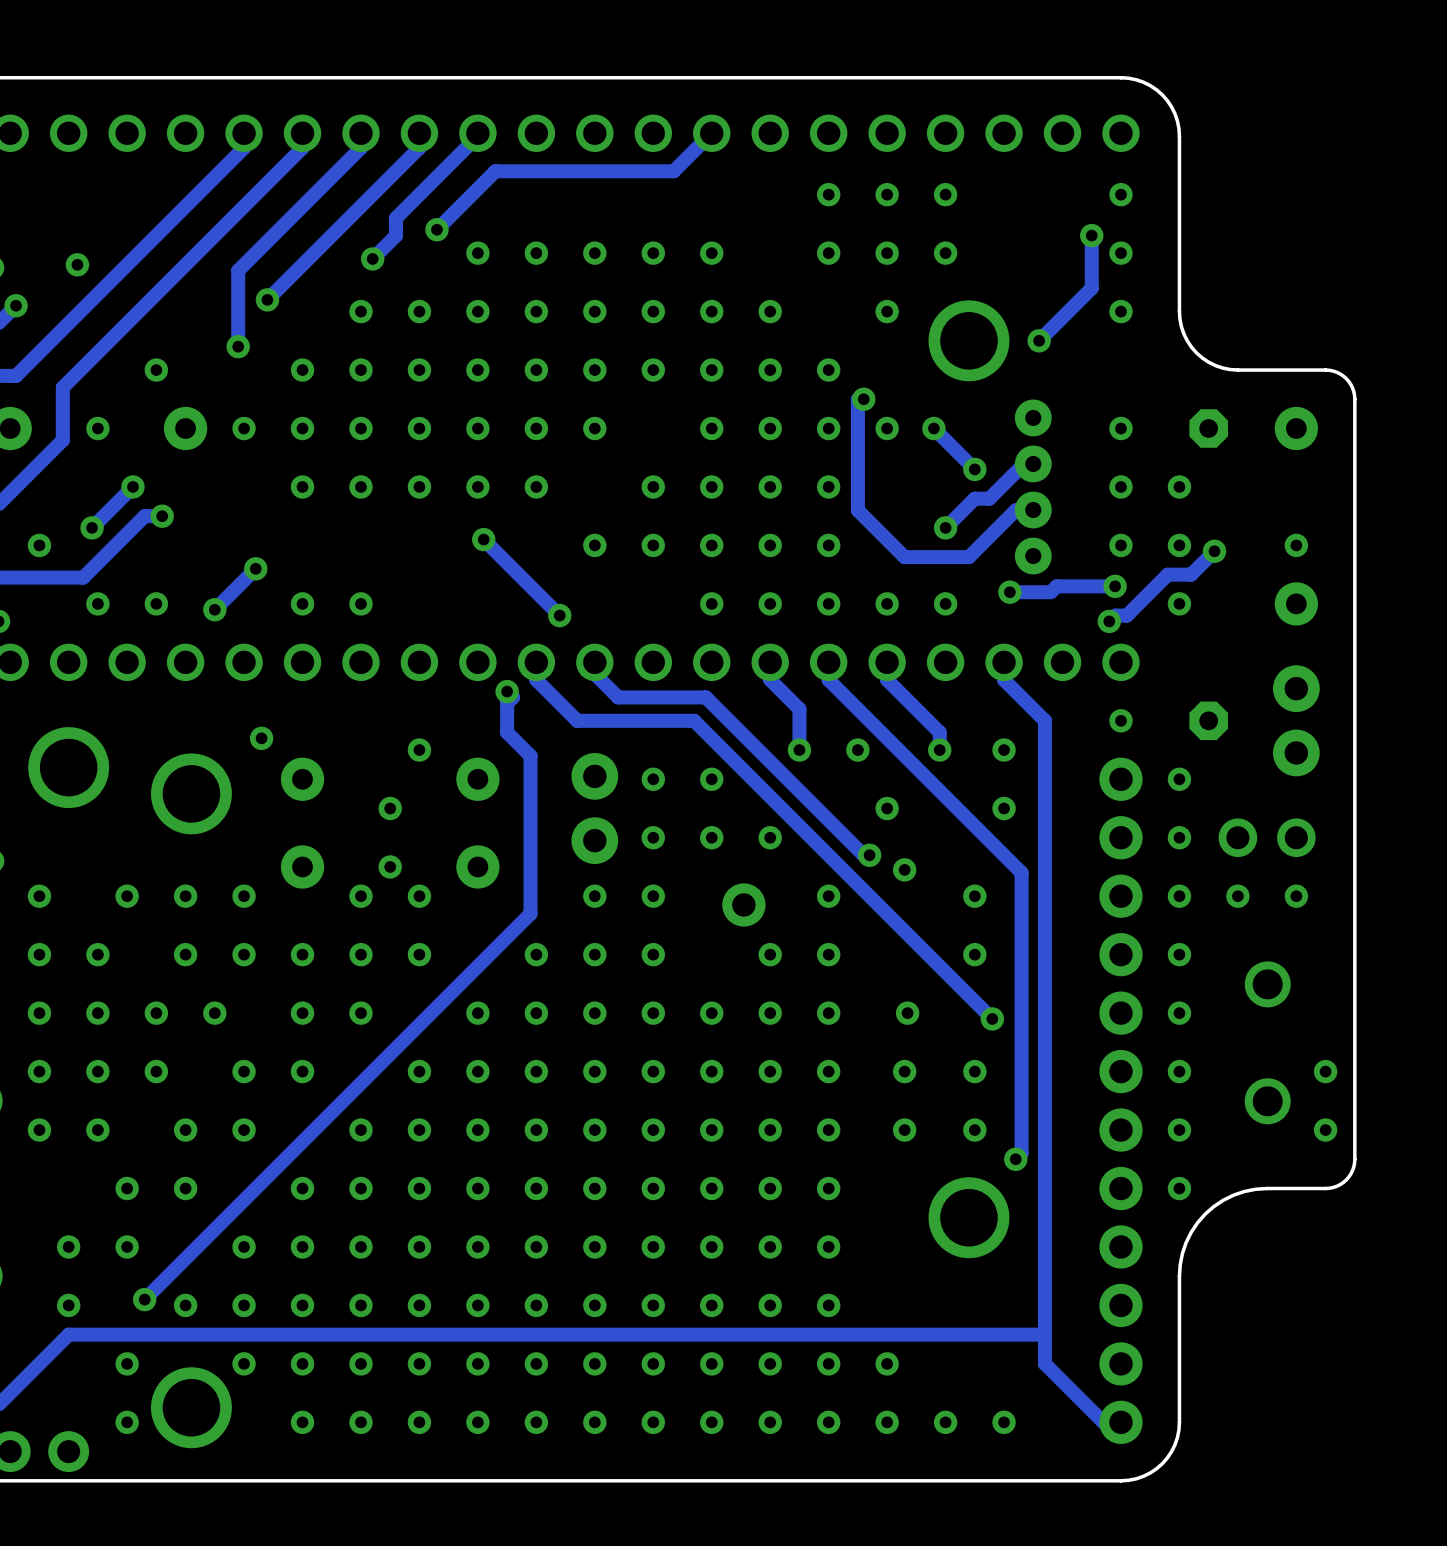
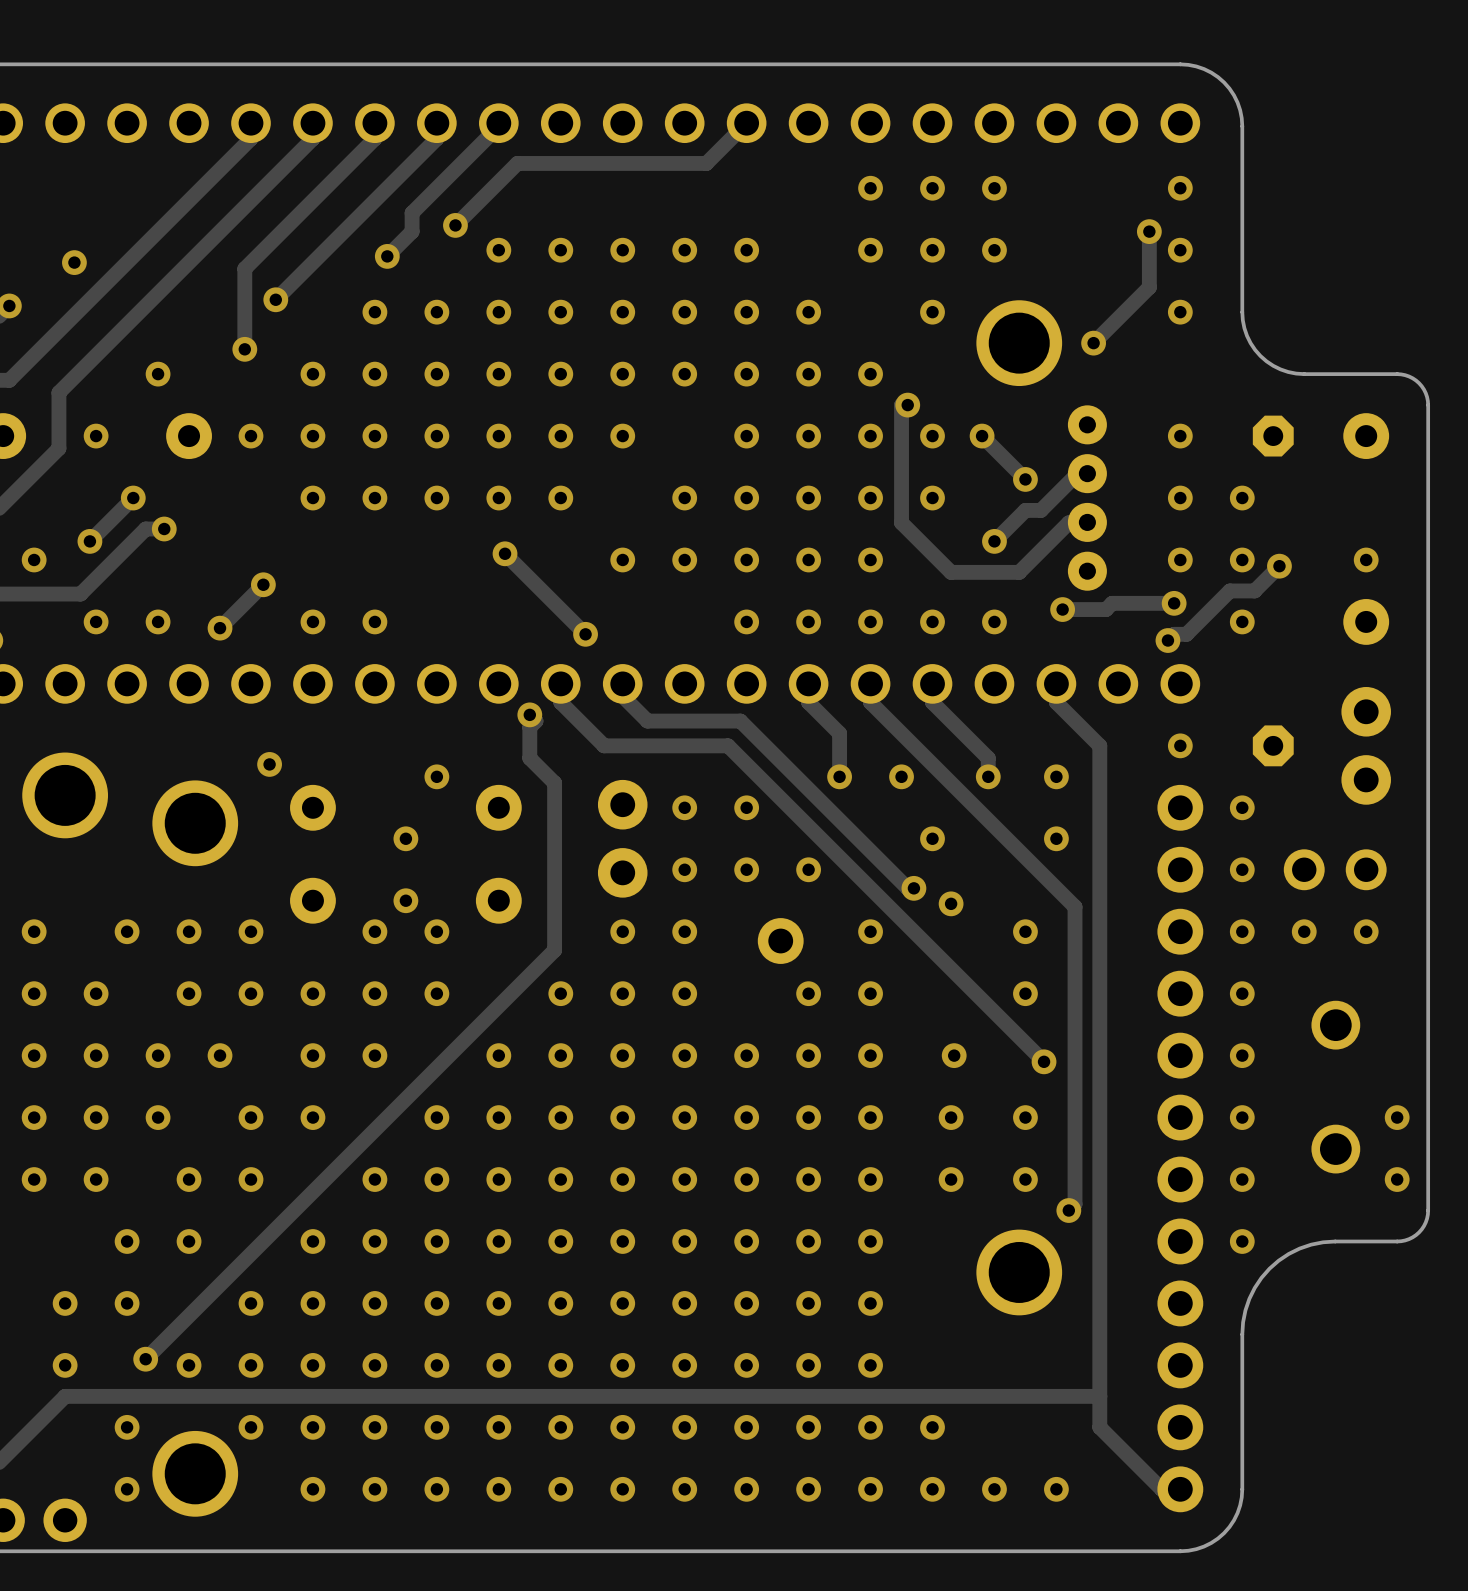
via: none -> (932, 498)

